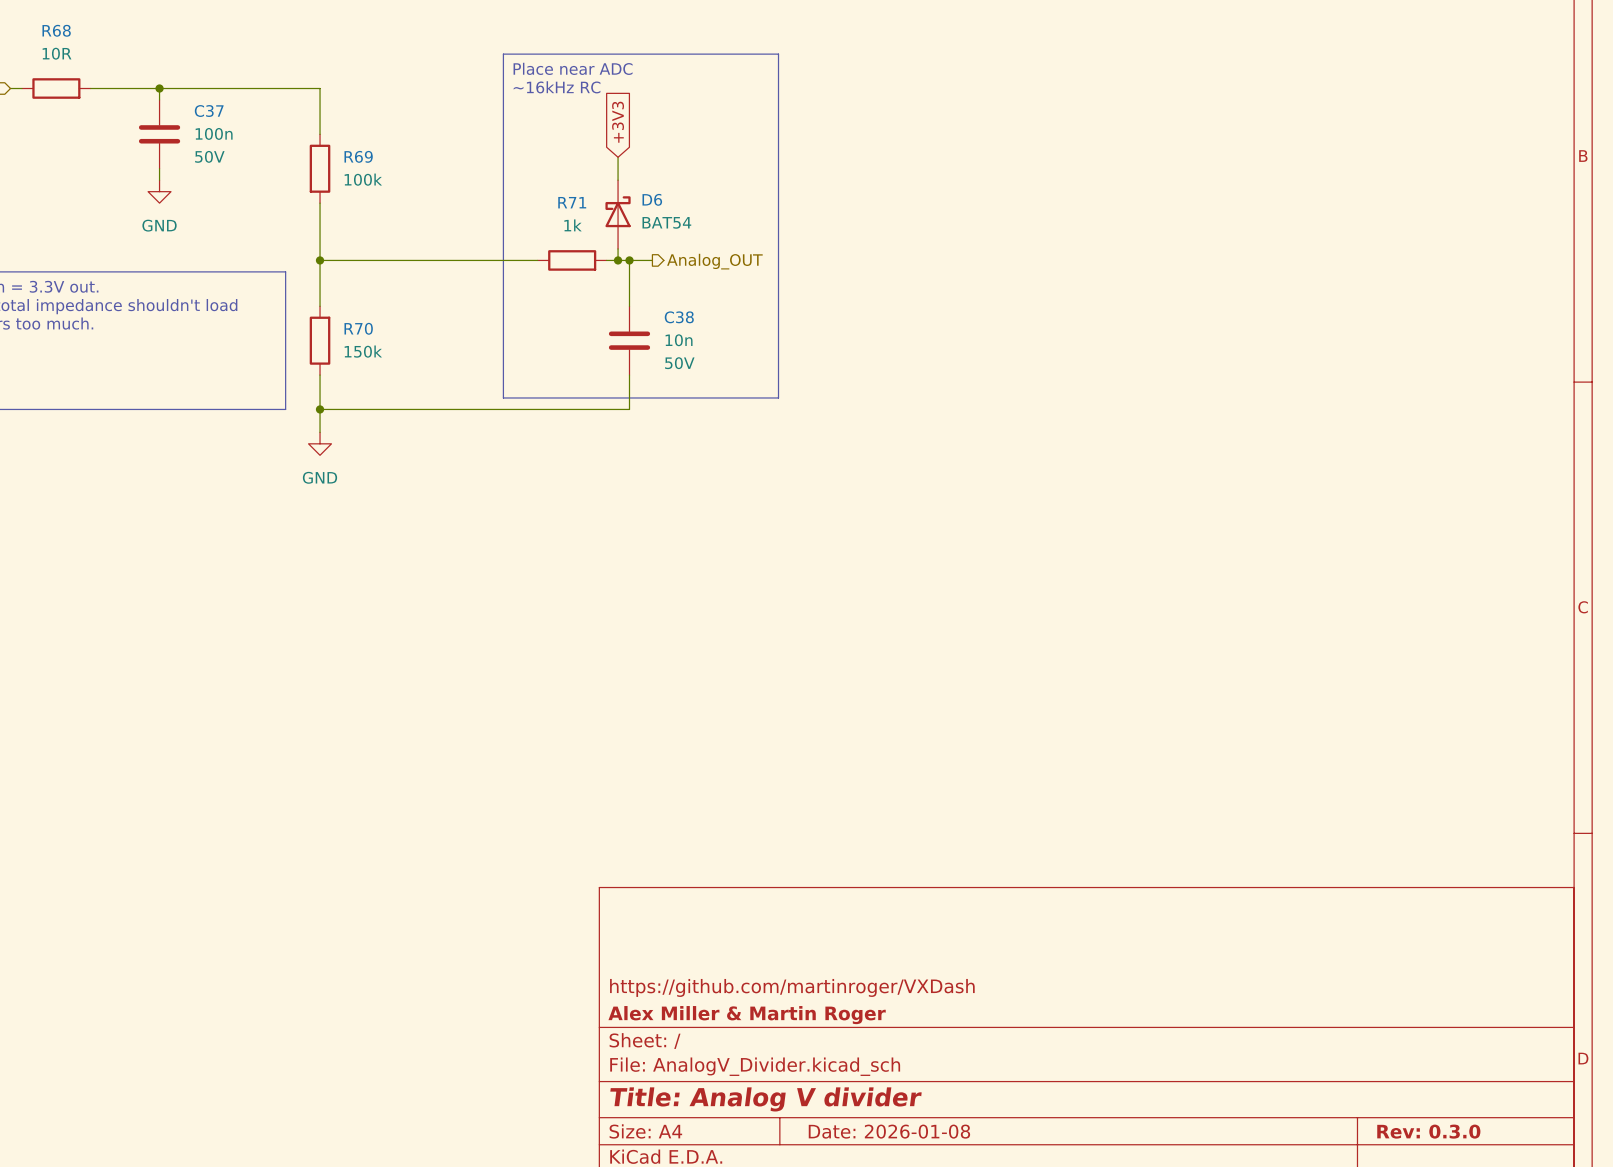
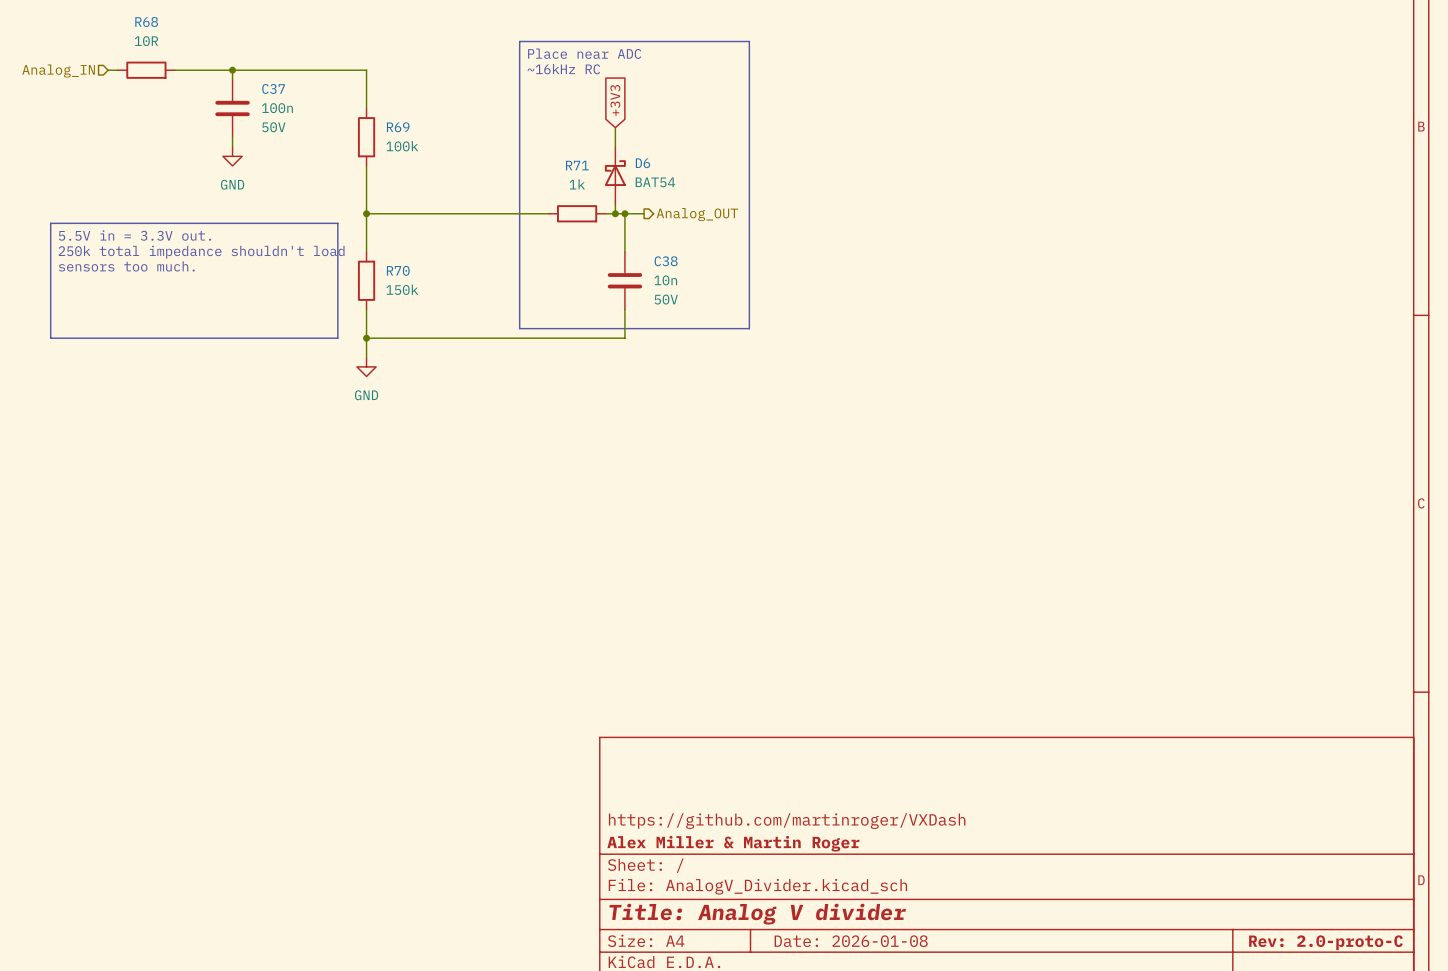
title block: Rev: 0.3.0 (1428, 1131) -> Rev: 2.0-proto-C (1325, 942)

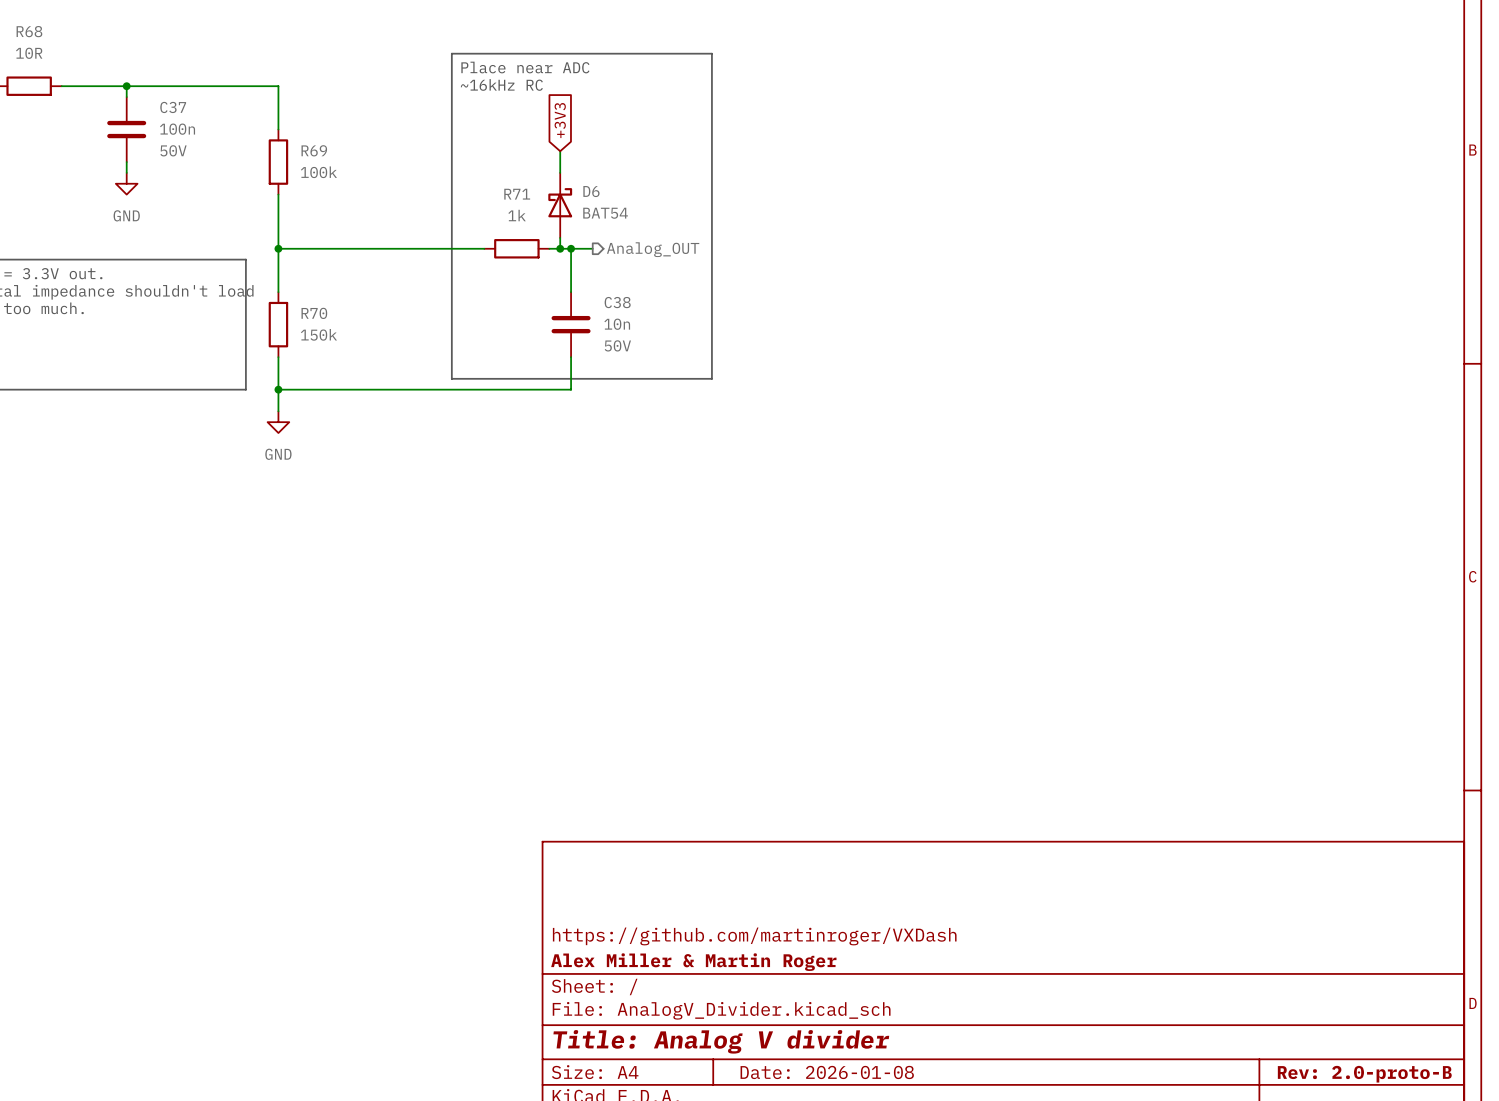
title block: Rev: 2.0-proto-C (1325, 942) -> Rev: 2.0-proto-B (1364, 1074)

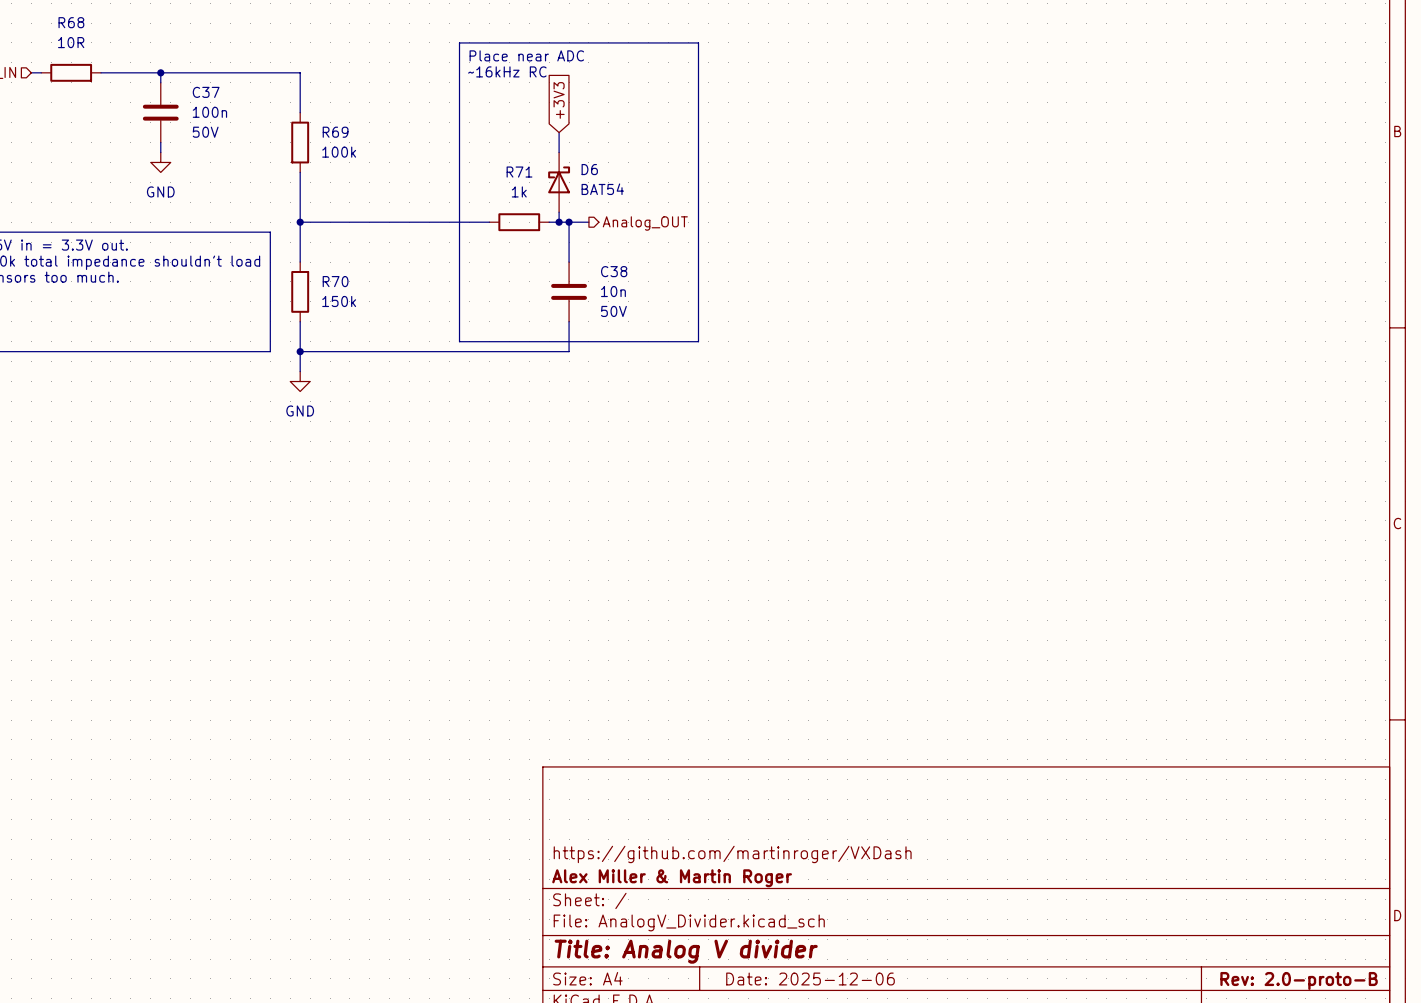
title block: Date: 2026-01-08 (827, 1072) -> Date: 2025-12-06 (810, 979)

